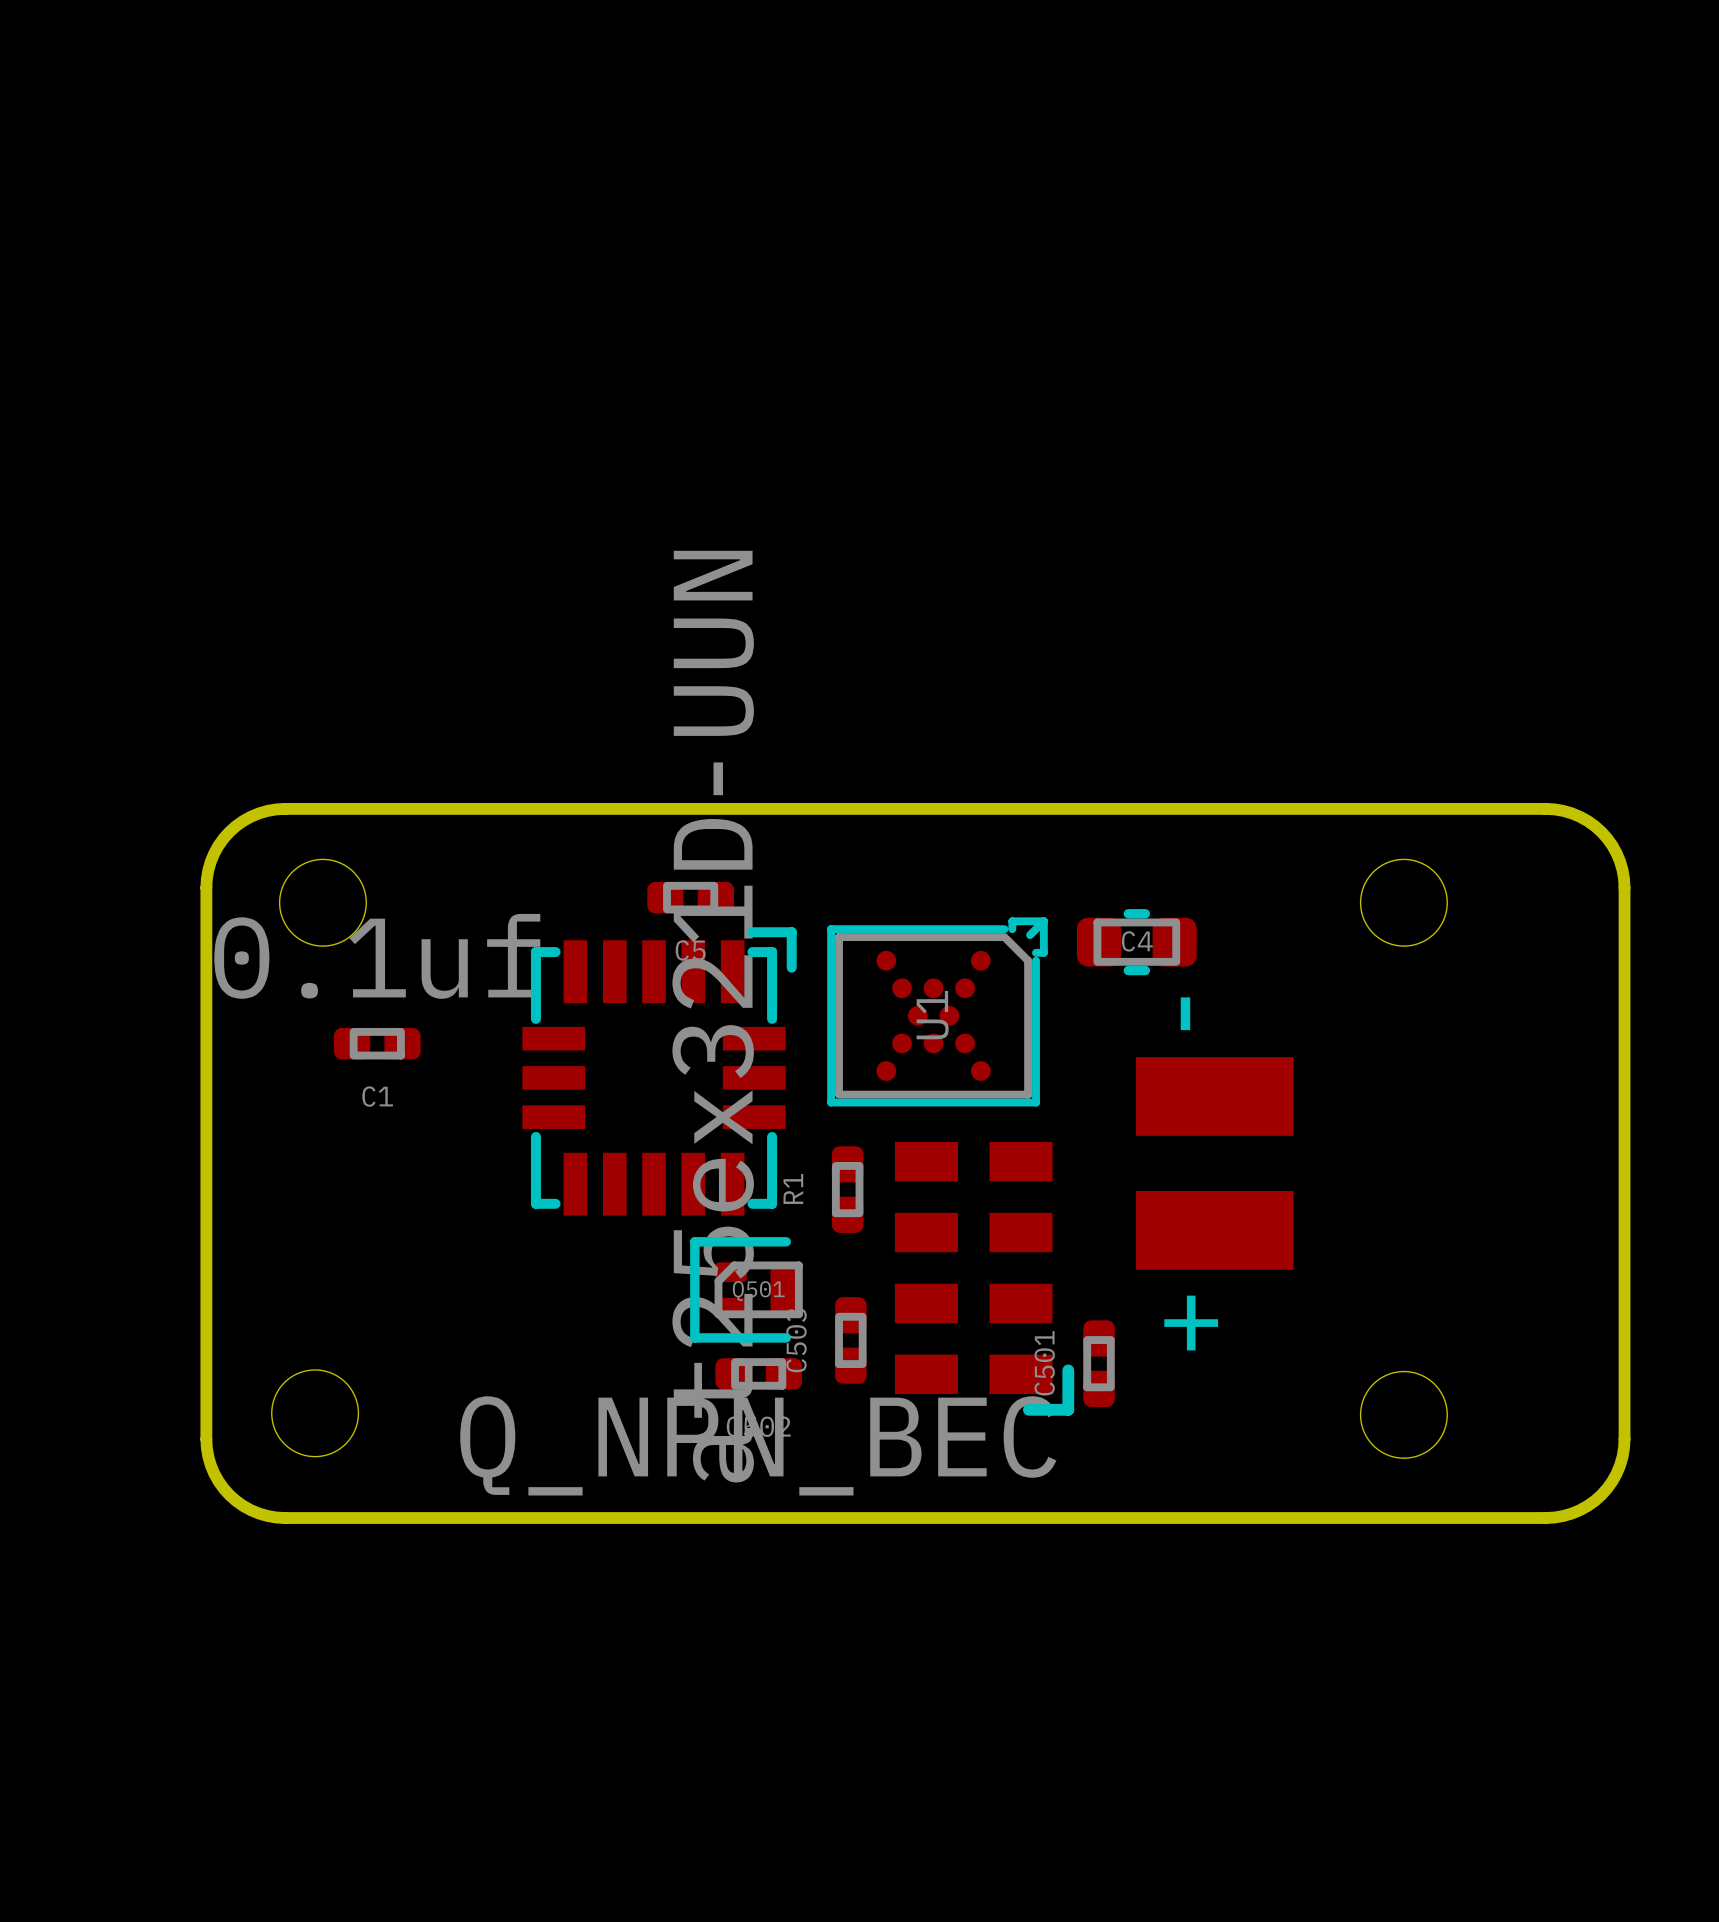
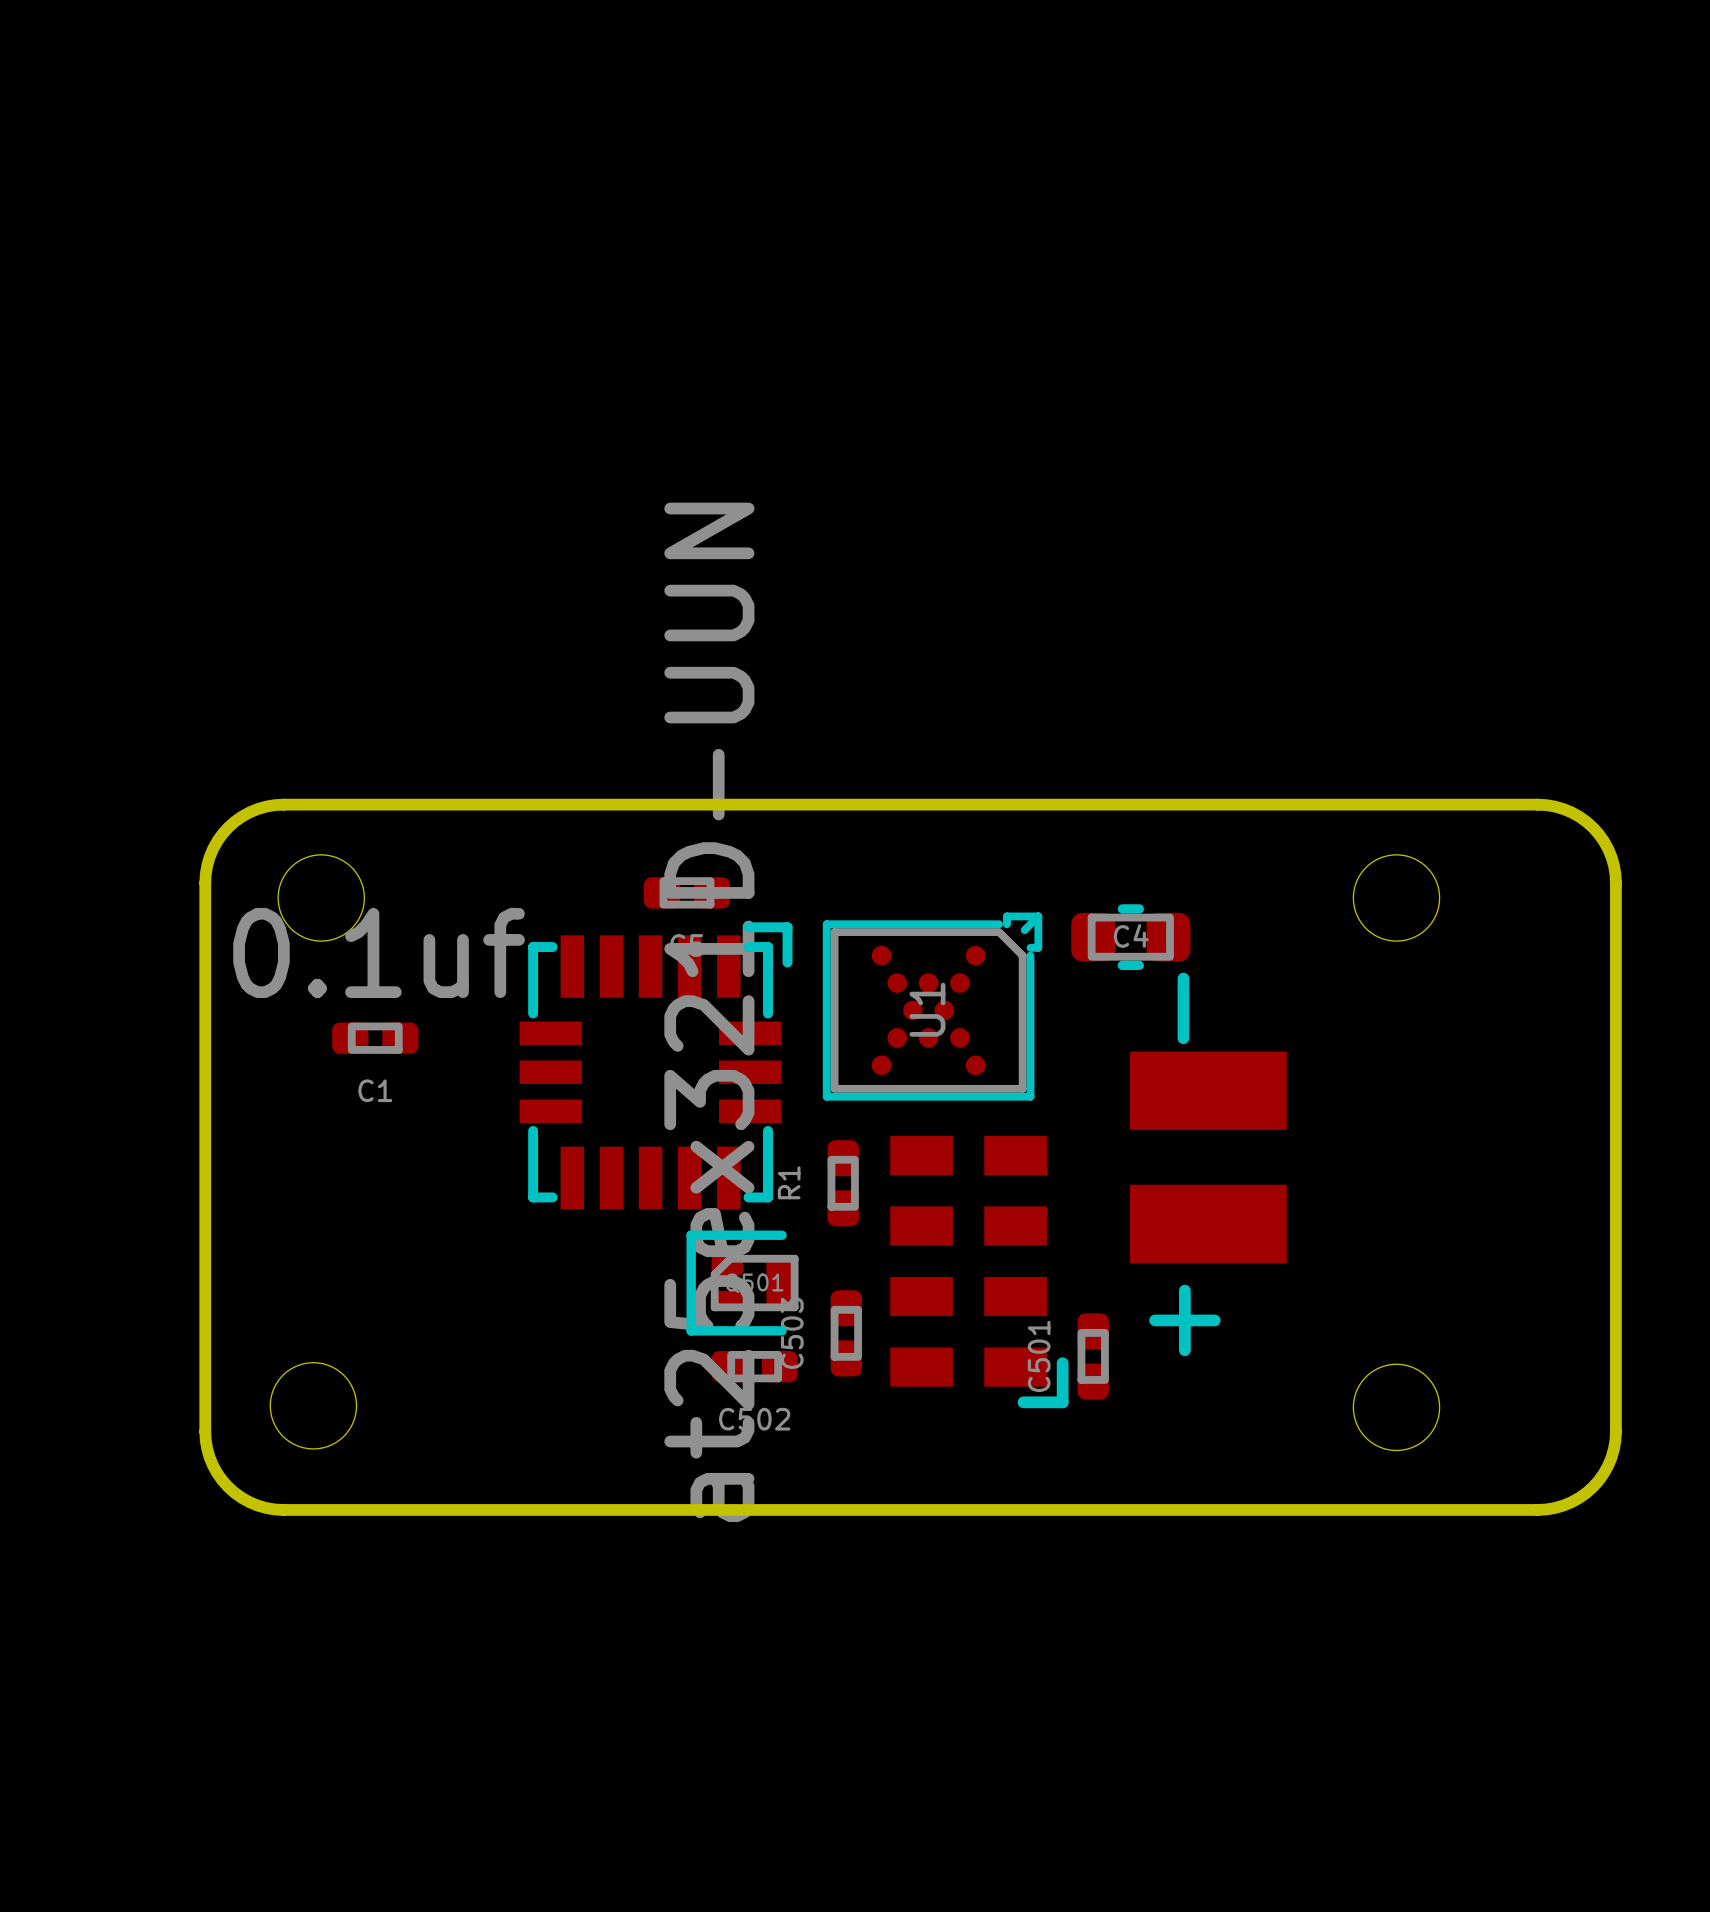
Q501 value: Q_NPN_BEC (758, 1445) -> none

